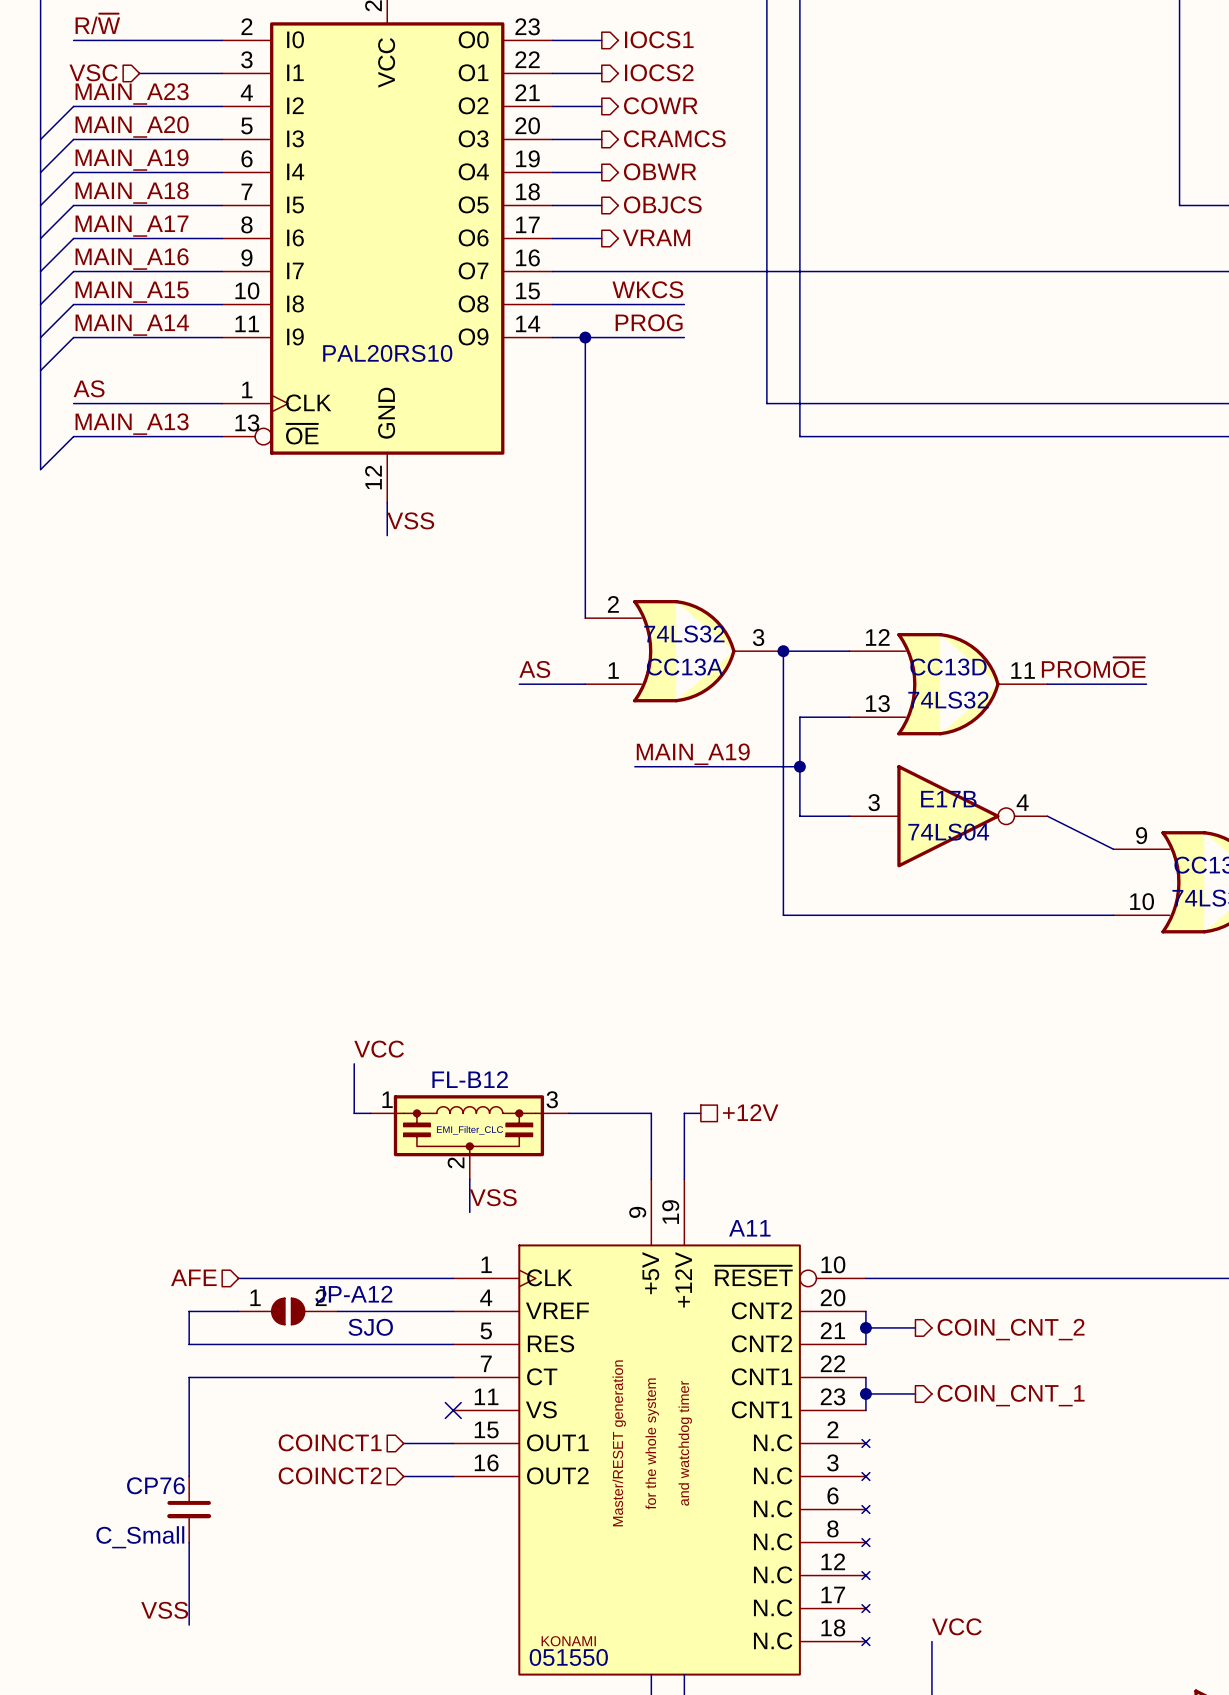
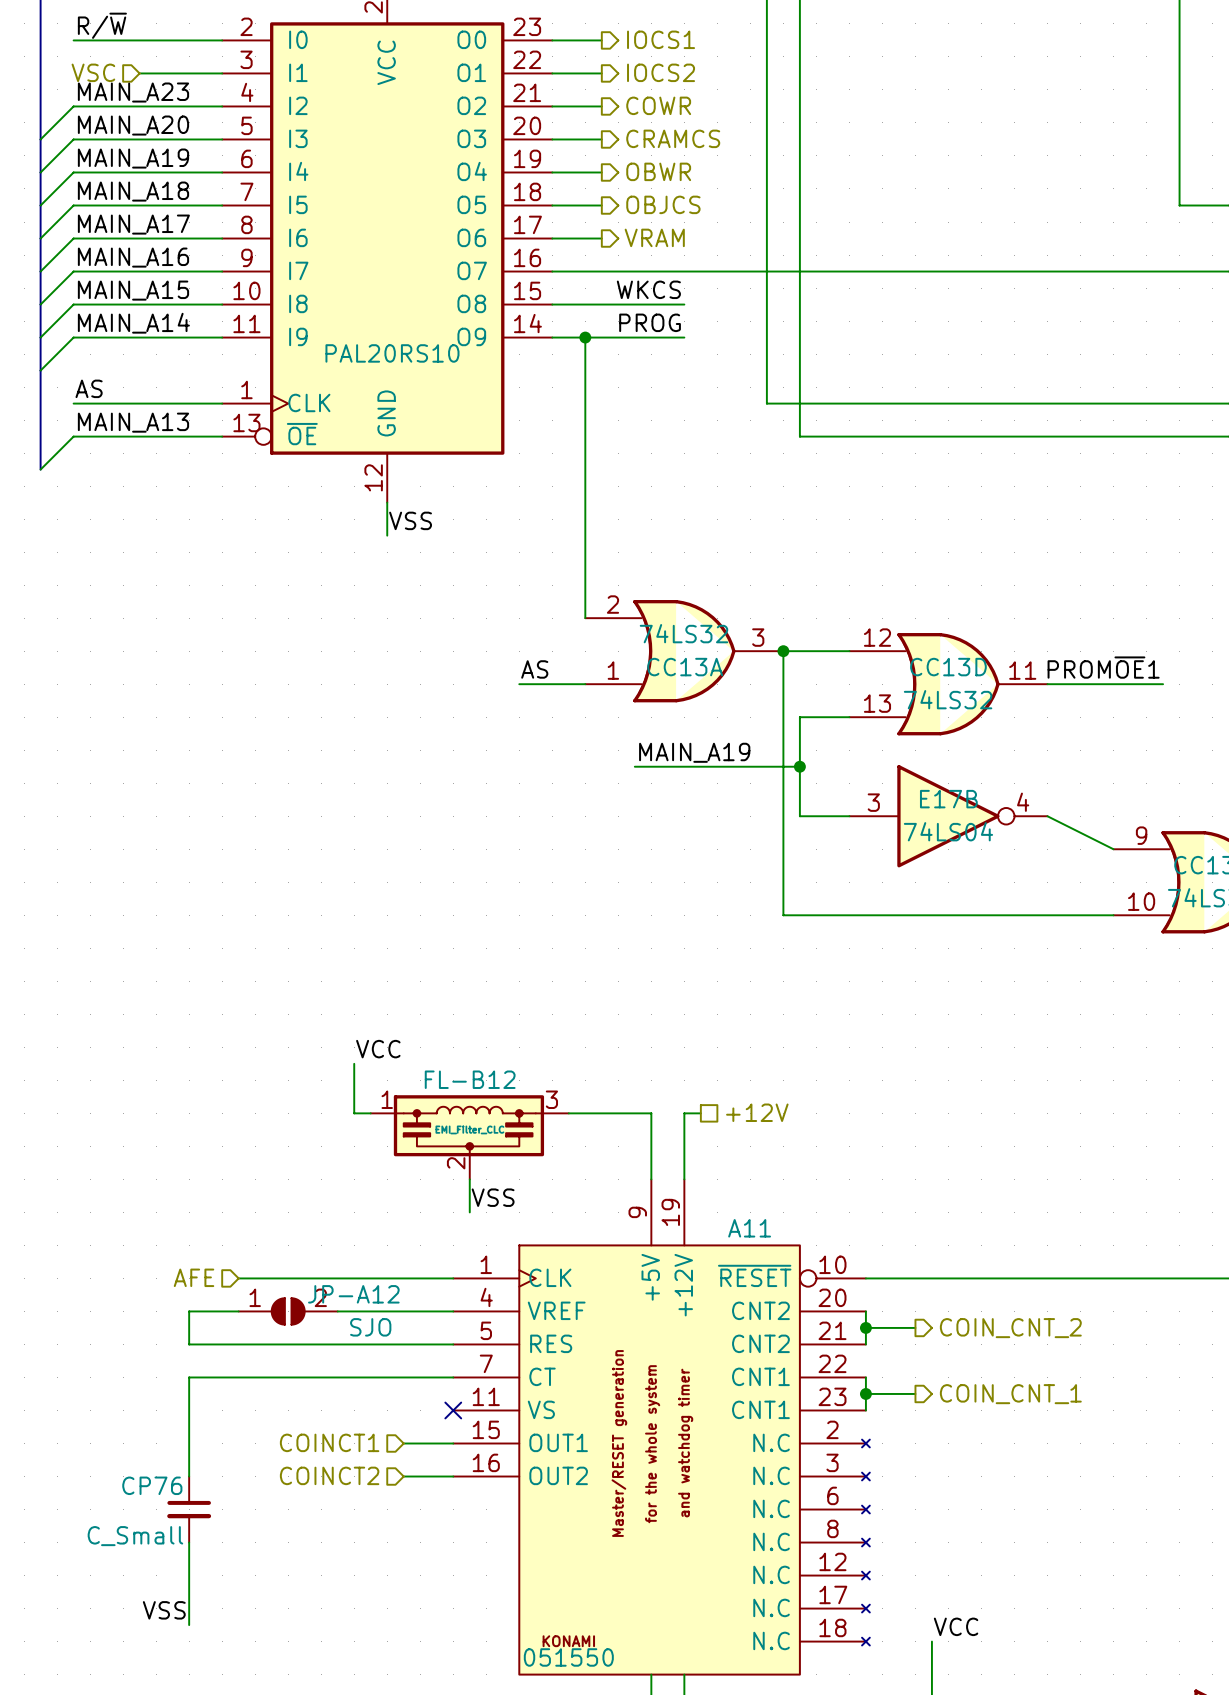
label: PROM~{OE} (1093, 667) -> PROM~{OE}1 (1103, 667)
wire: none -> (1146, 684) (1163, 684)

